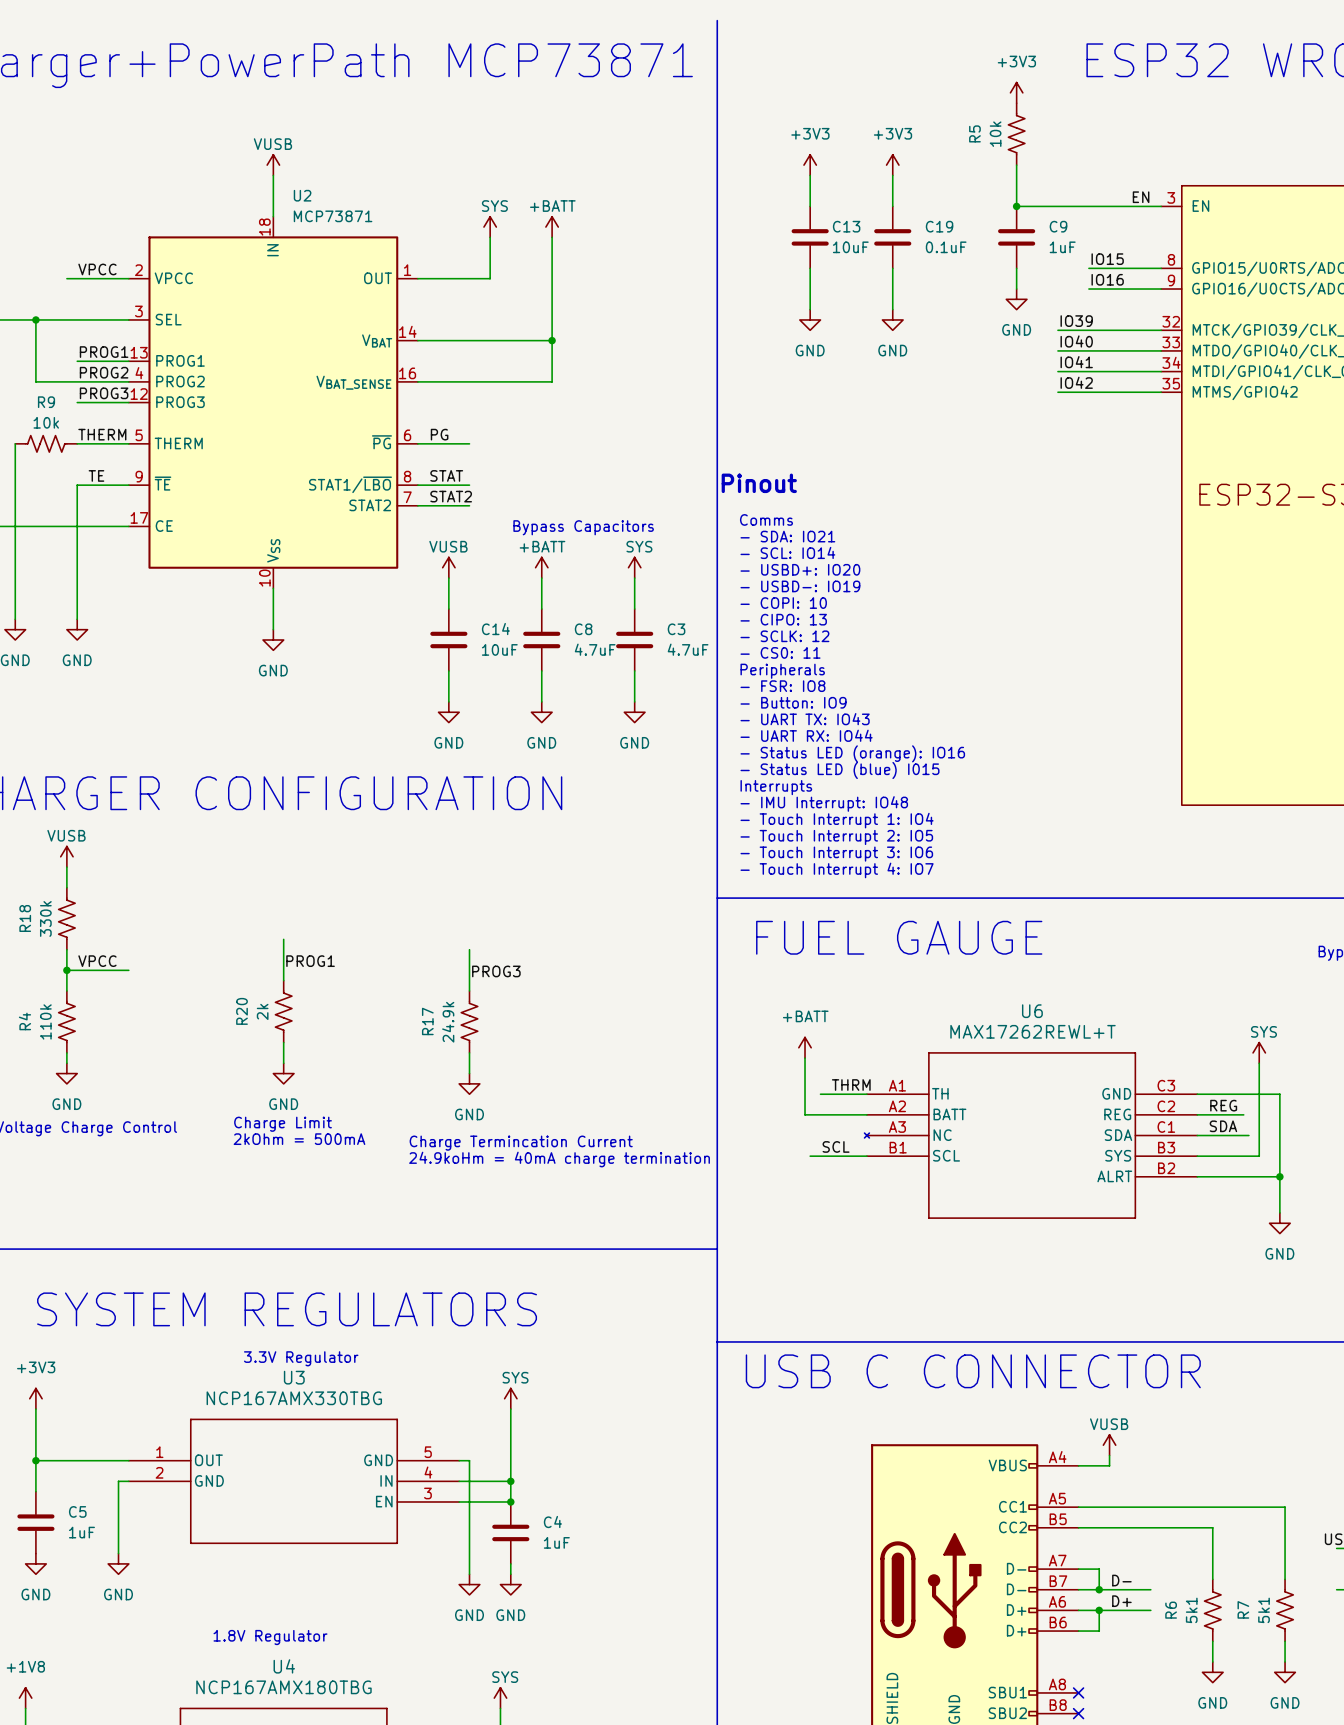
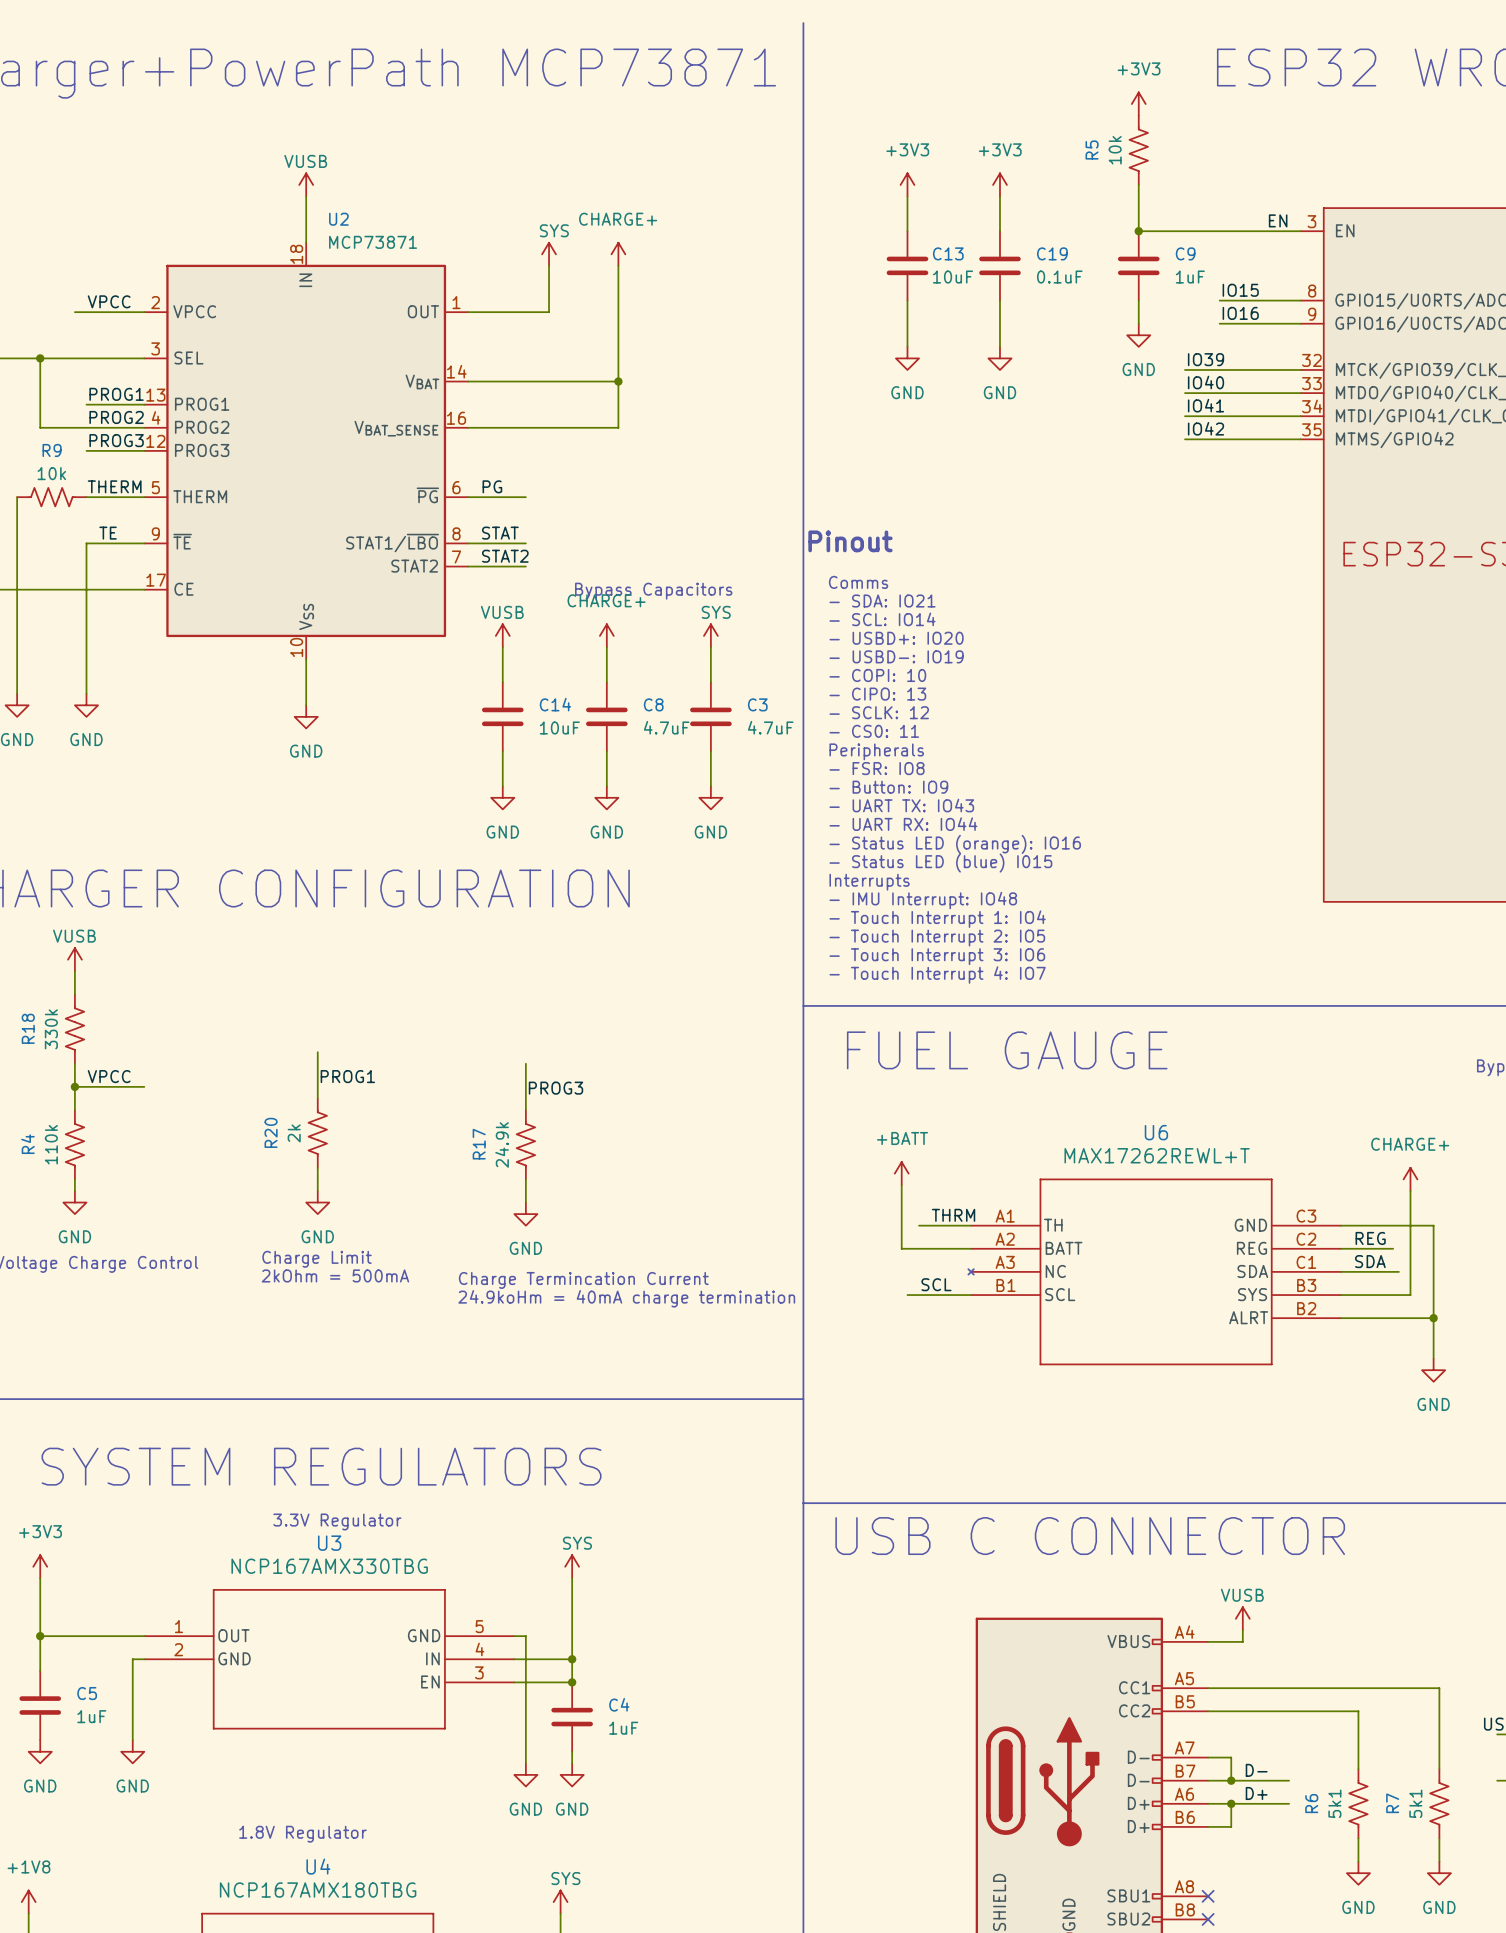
power symbol: +BATT (552, 227) -> CHARGE+ (618, 254)
power symbol: +BATT (541, 567) -> CHARGE+ (606, 635)
power symbol: none -> CHARGE+ (1410, 1179)
part: SYS (1259, 1052) -> none

